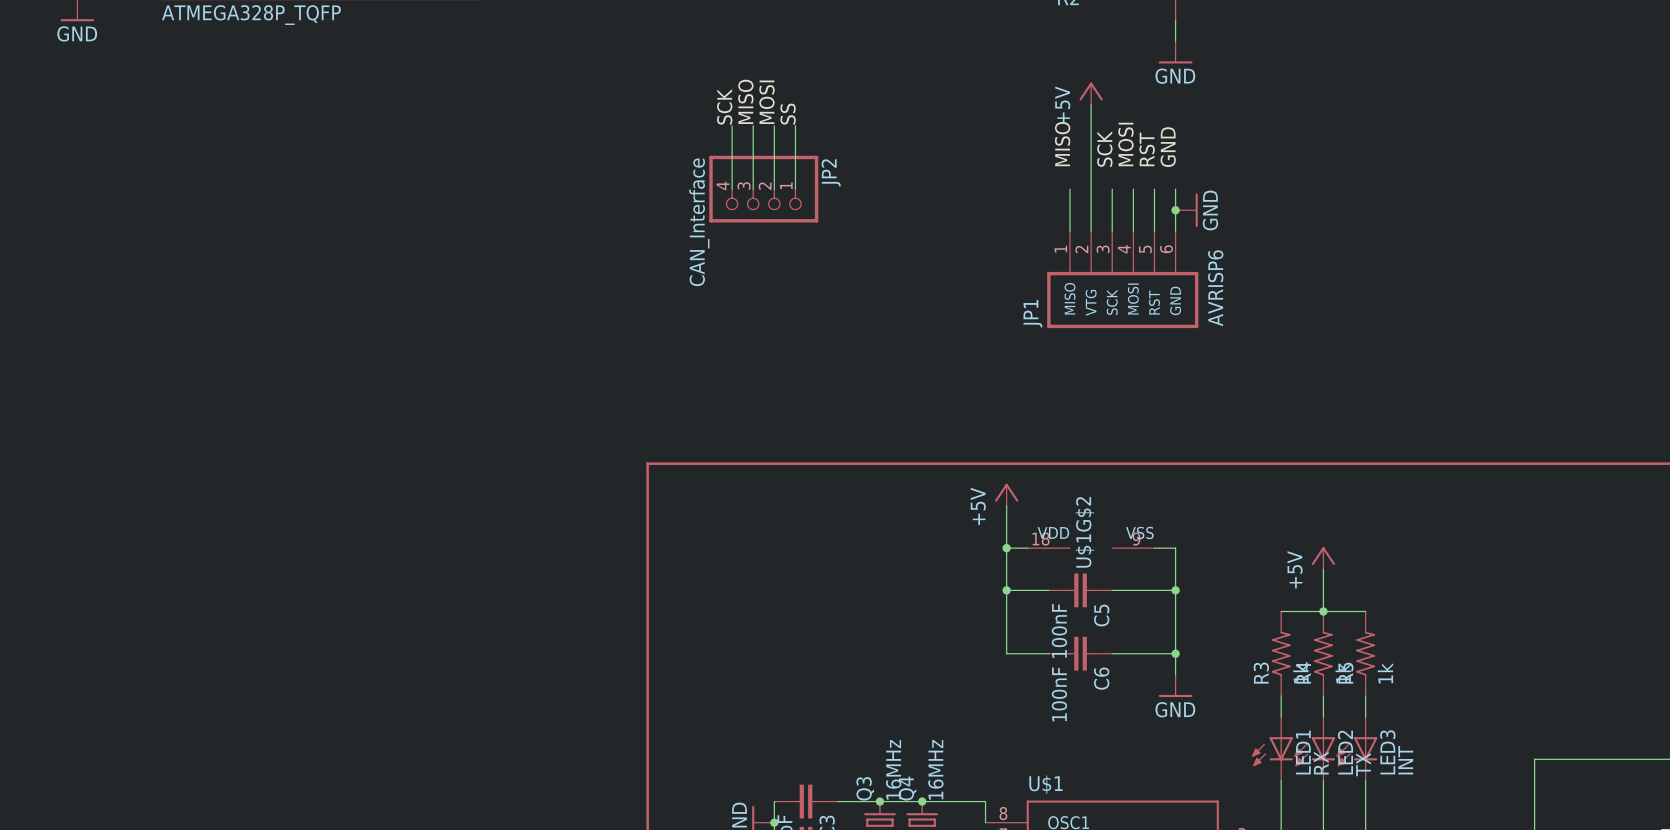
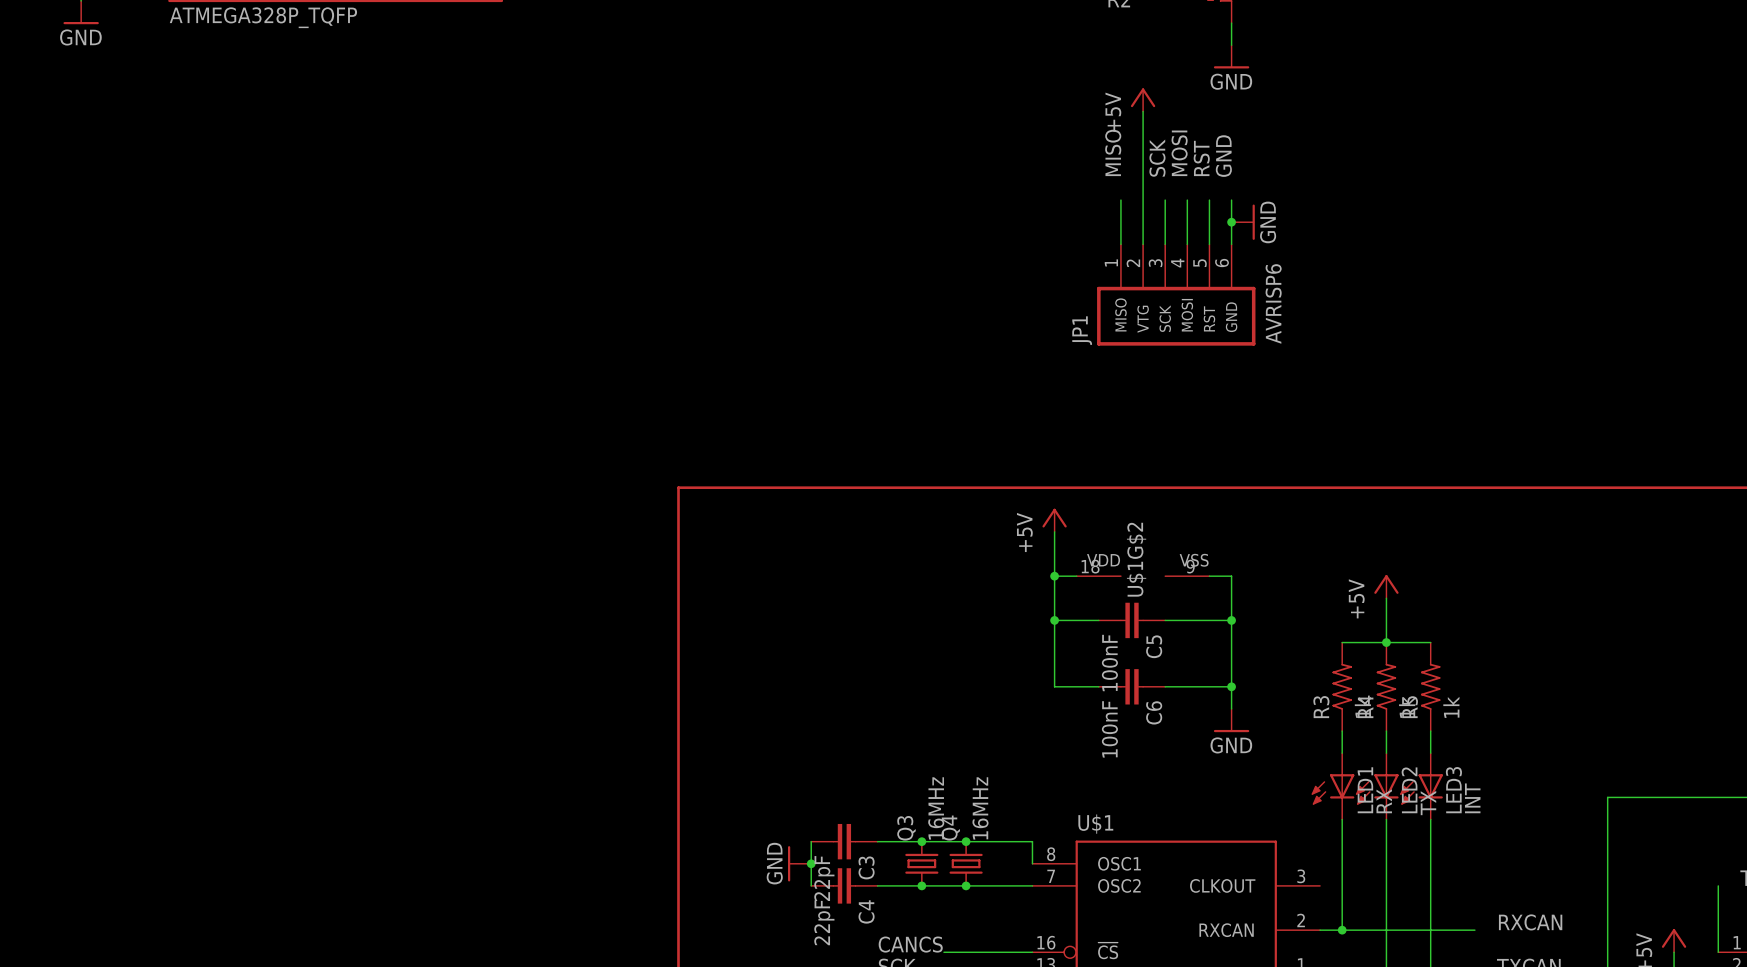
label: MISO (745, 101) -> none
label: MOSI (766, 102) -> none
label: SCK (724, 106) -> none
label: SS (788, 114) -> none
wire: (732, 125) (732, 189) -> none
wire: (753, 125) (753, 189) -> none
wire: (774, 125) (774, 189) -> none
wire: (795, 125) (795, 189) -> none
JP2: CAN_Interface (763, 189) -> none

